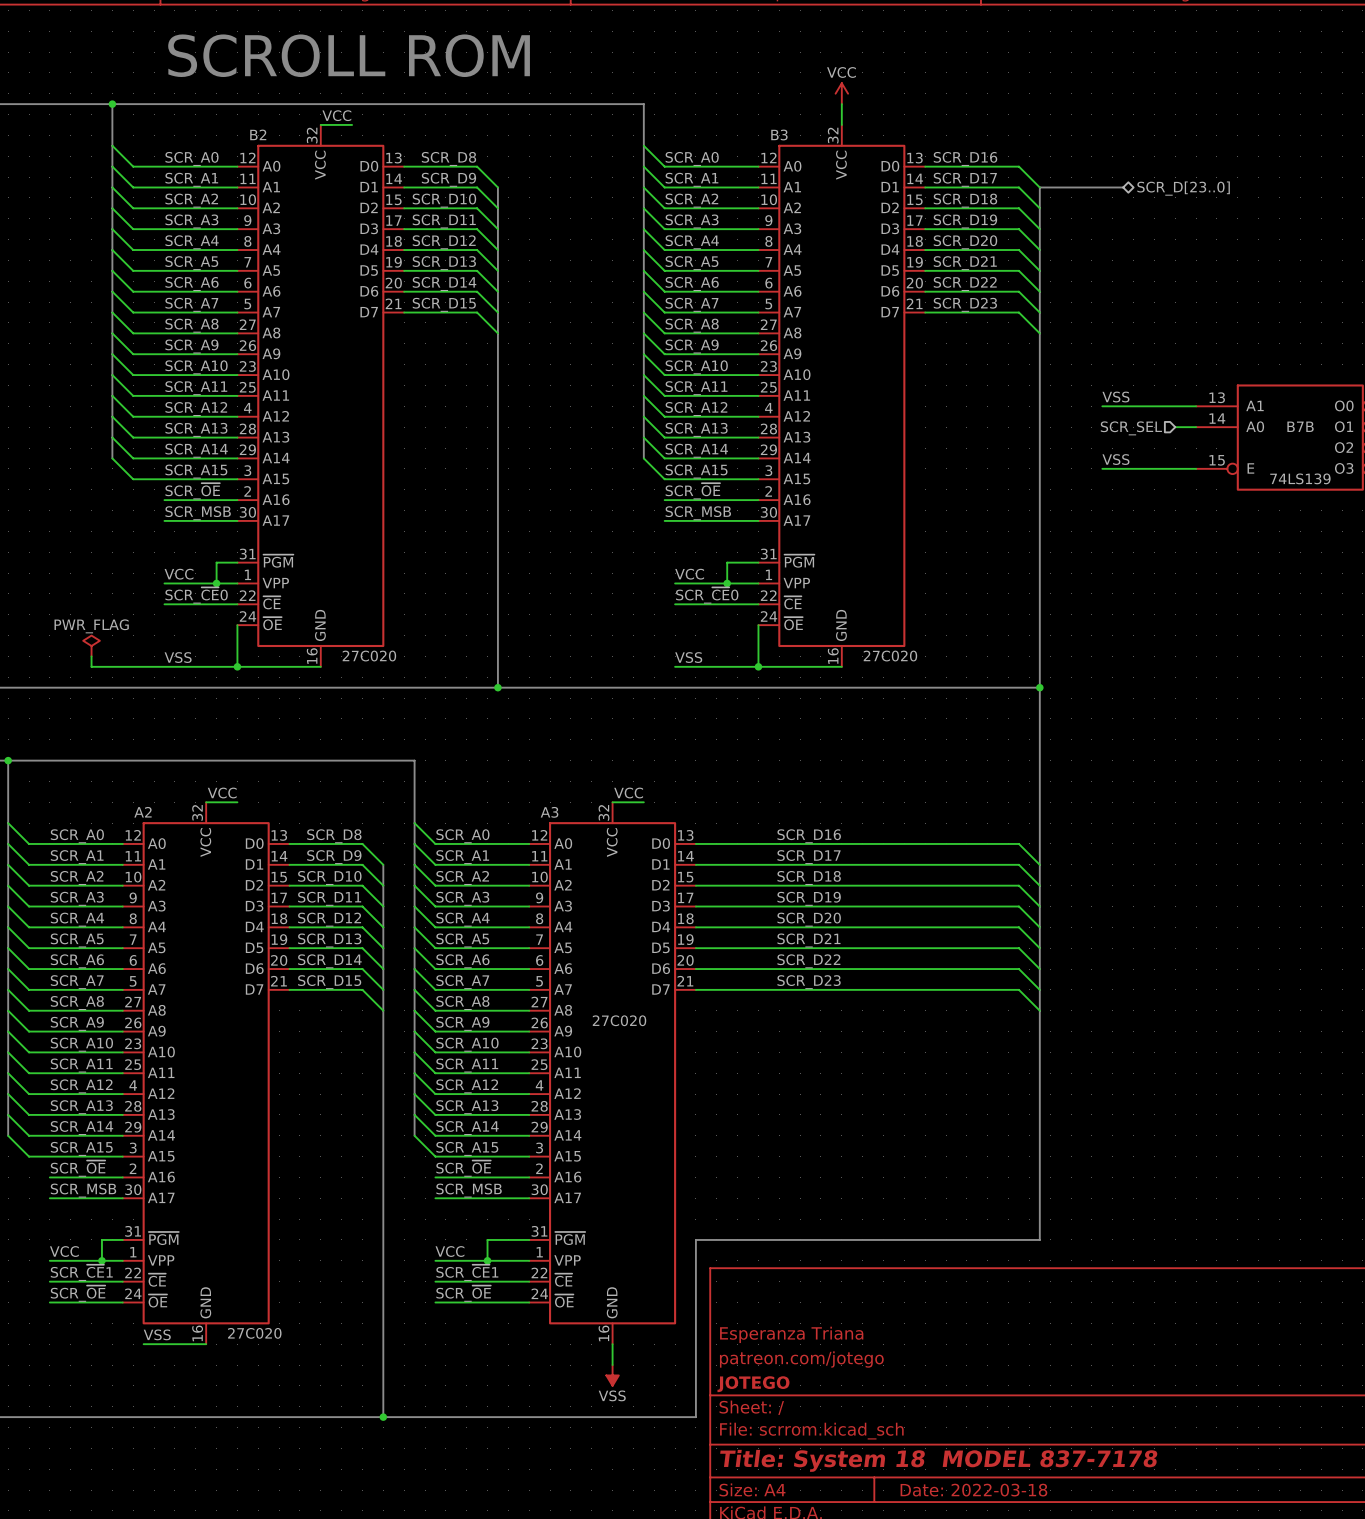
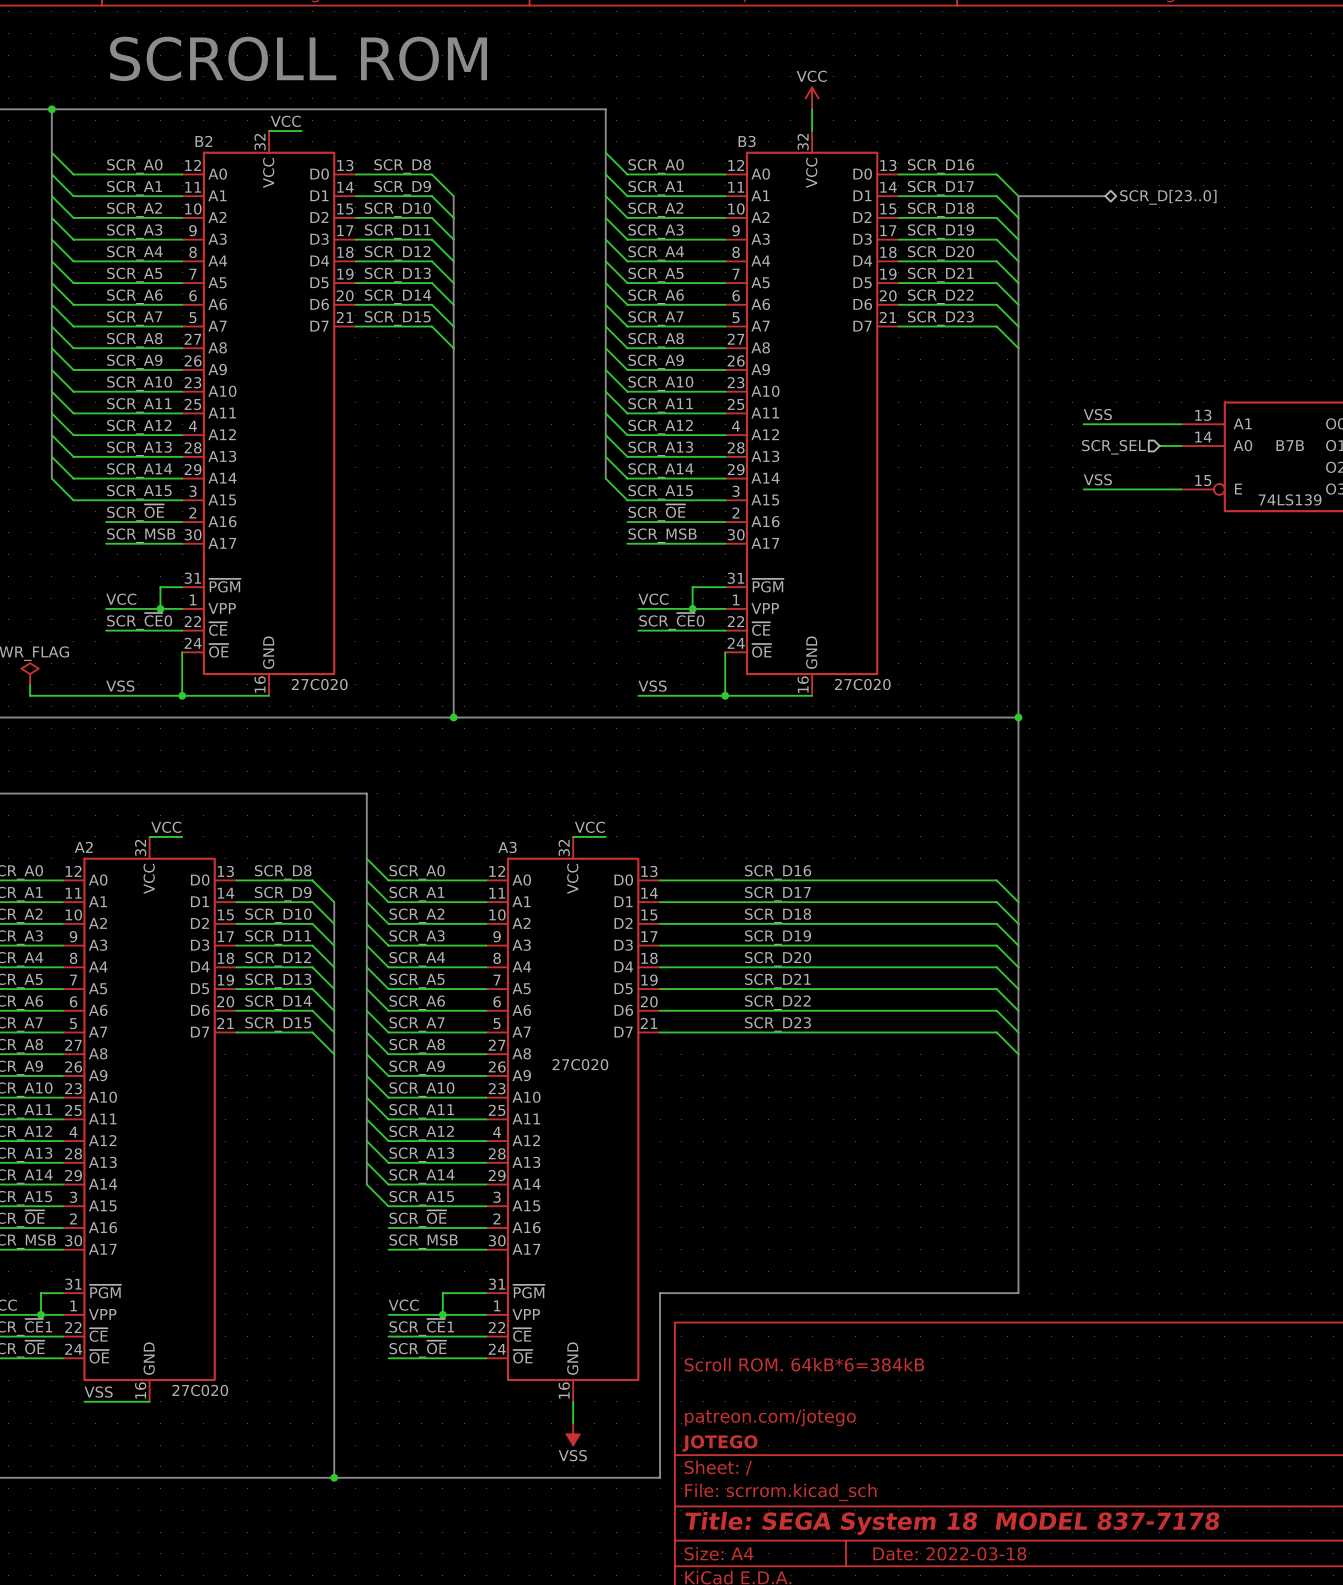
title block: none -> Scroll ROM. 64kB*6=384kB (804, 1364)
title block: Esperanza Triana (791, 1334) -> none
title block: Title: System 18 MODEL 837-7178 (938, 1460) -> Title: SEGA System 18 MODEL 837-7178 (952, 1523)

